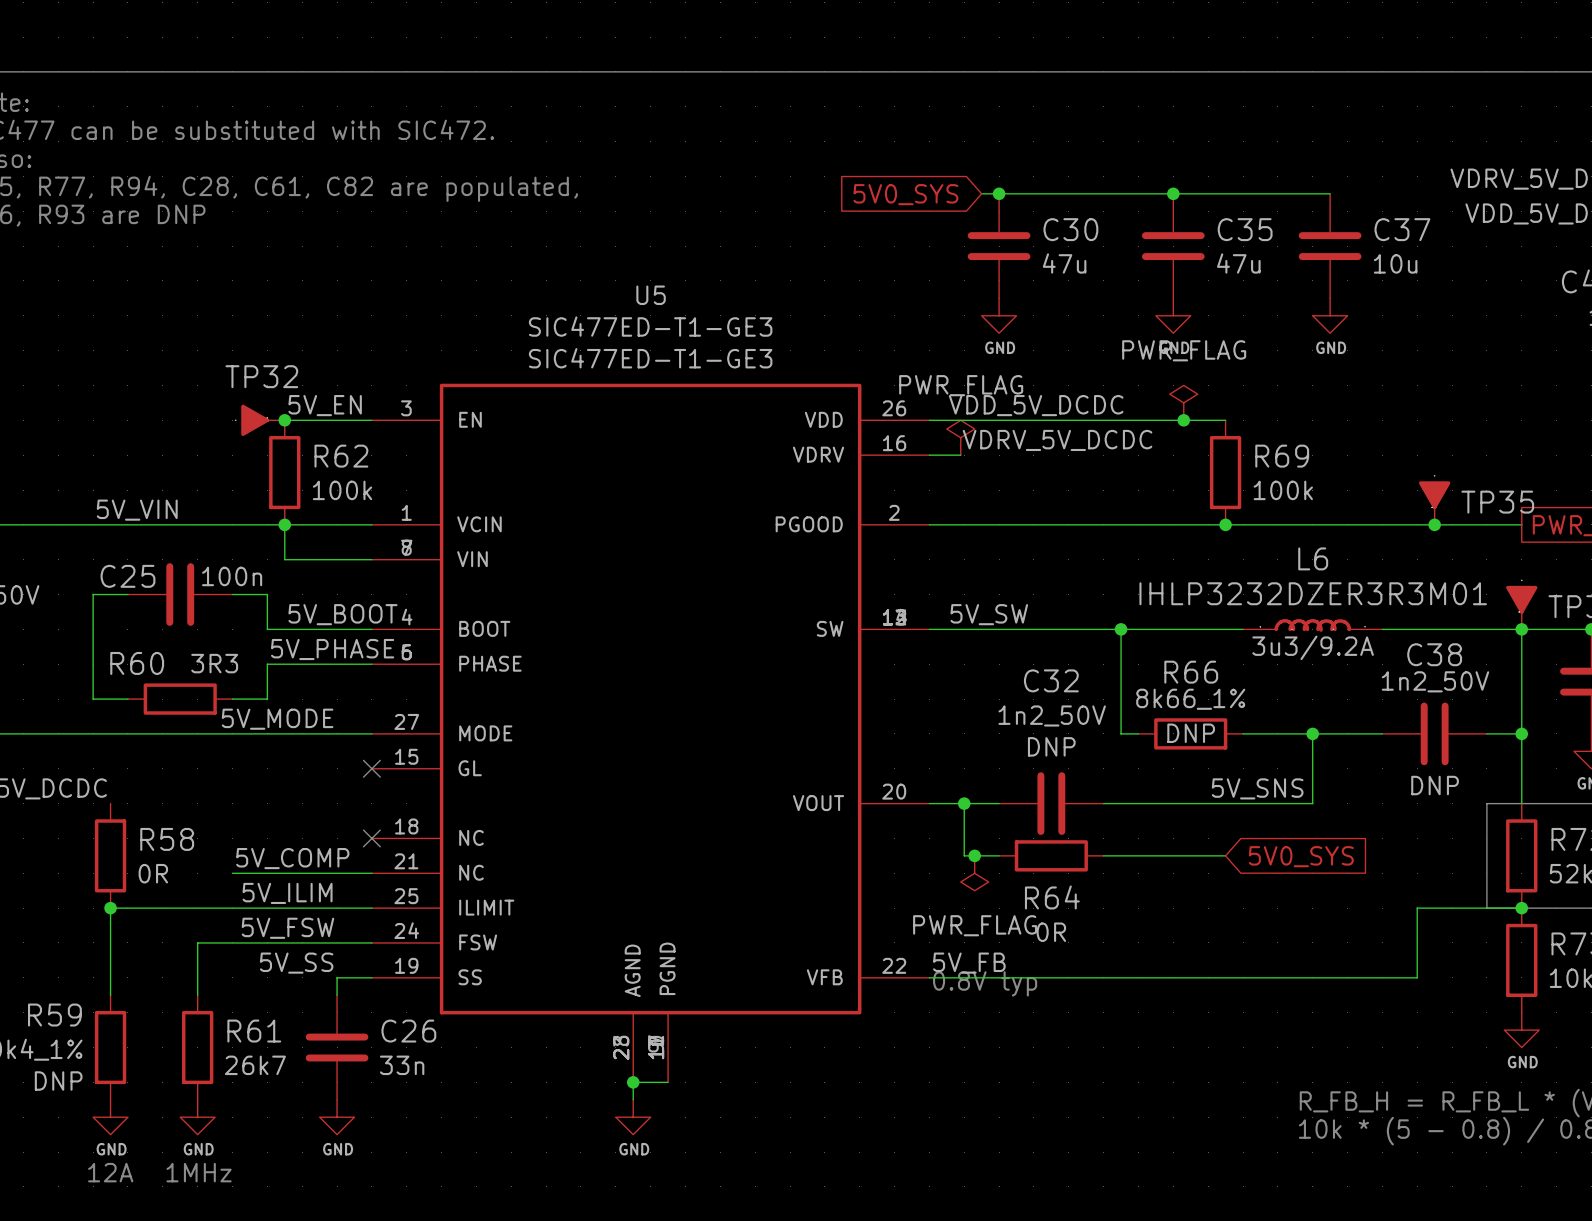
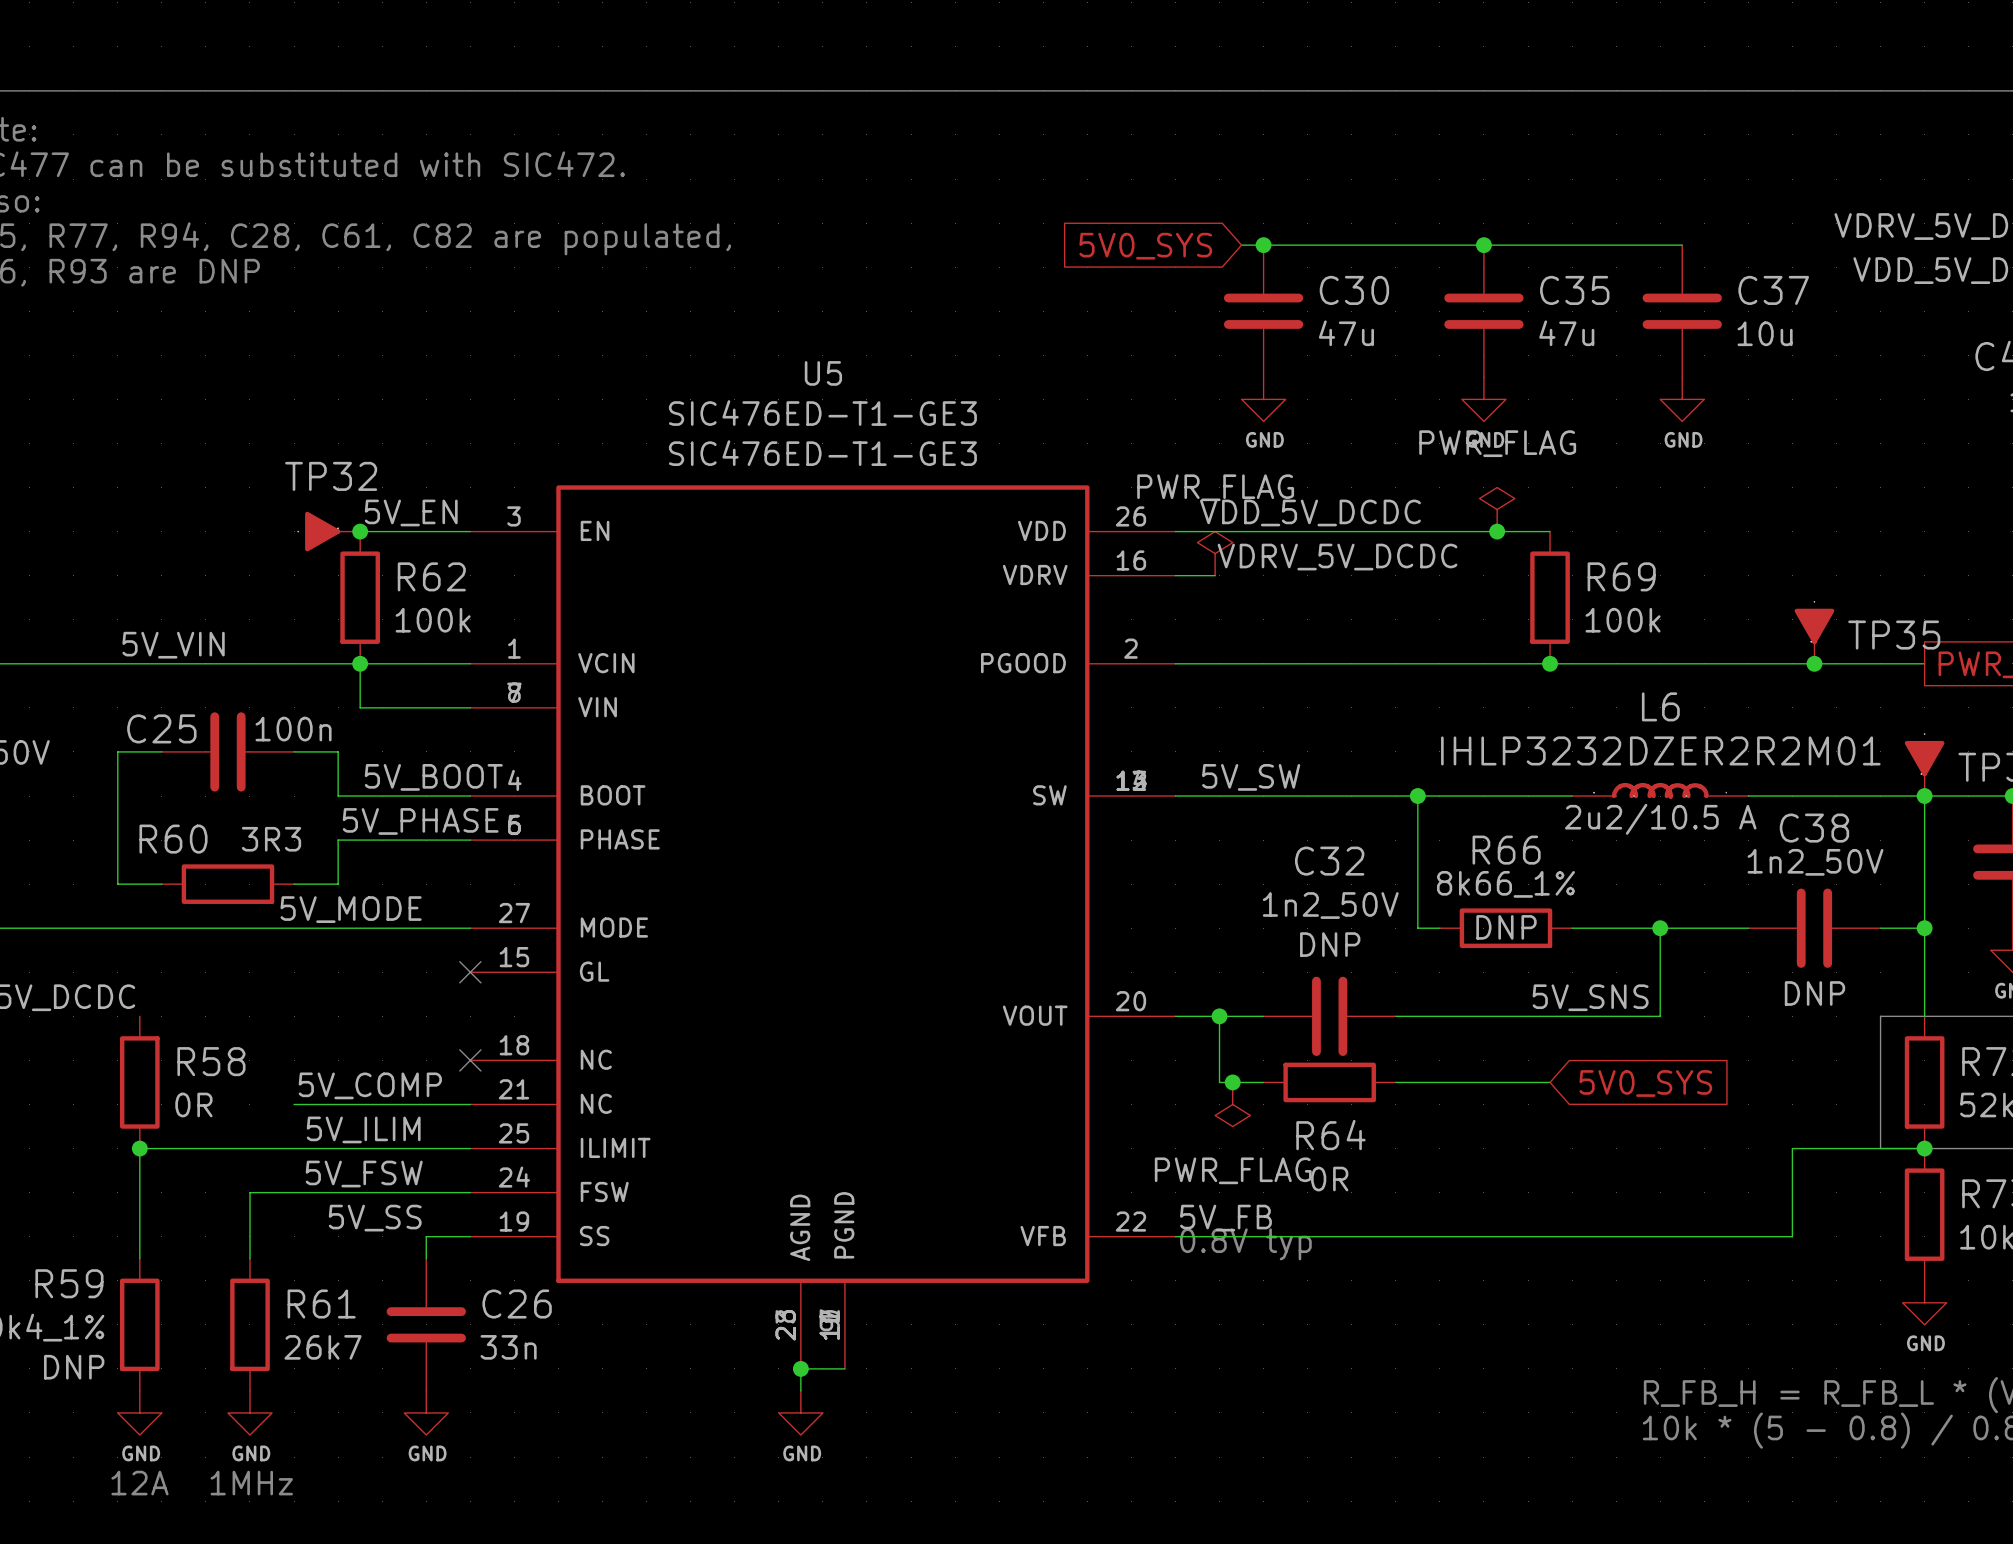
U5 value: SIC477ED-T1-GE3 (650, 326) -> SIC476ED-T1-GE3 (822, 413)
U5 text: SIC477ED-T1-GE3 (650, 358) -> SIC476ED-T1-GE3 (822, 453)
L6 value: IHLP3232DZER3R3M01 (1313, 593) -> IHLP3232DZER2R2M01 (1660, 750)
L6 text: 3u3/9.2A (1313, 647) -> 2u2/10.5 A (1660, 819)

